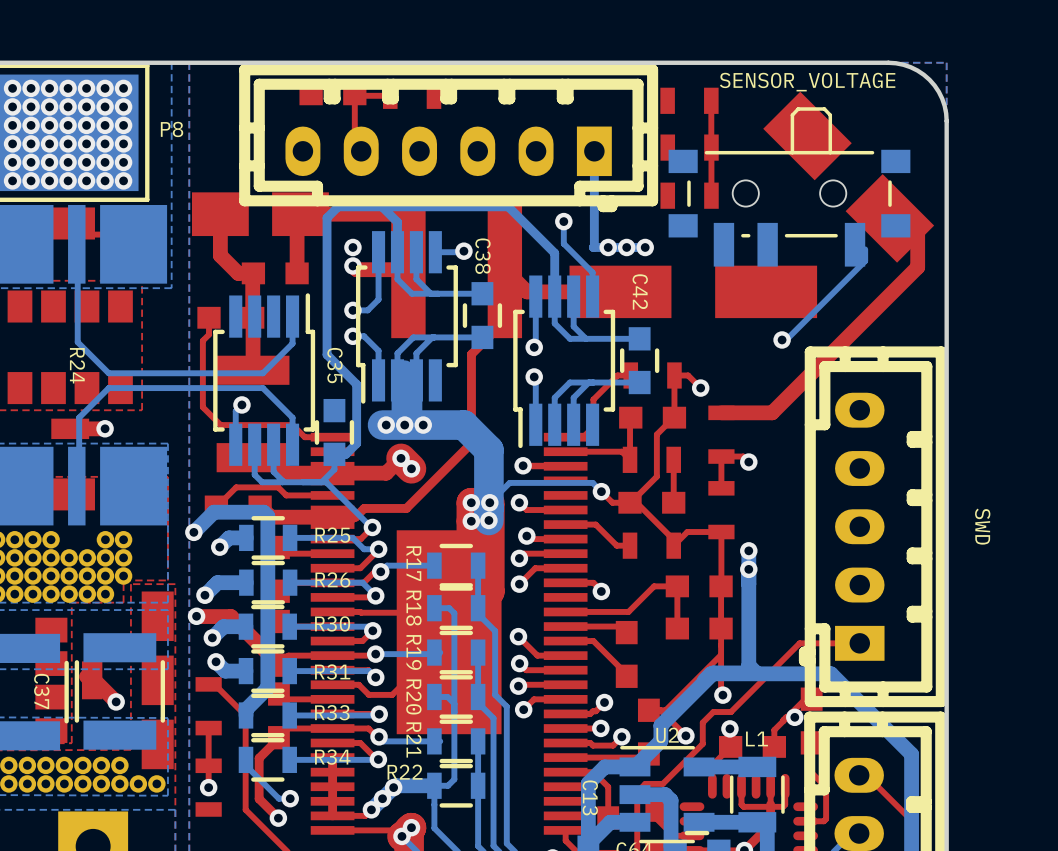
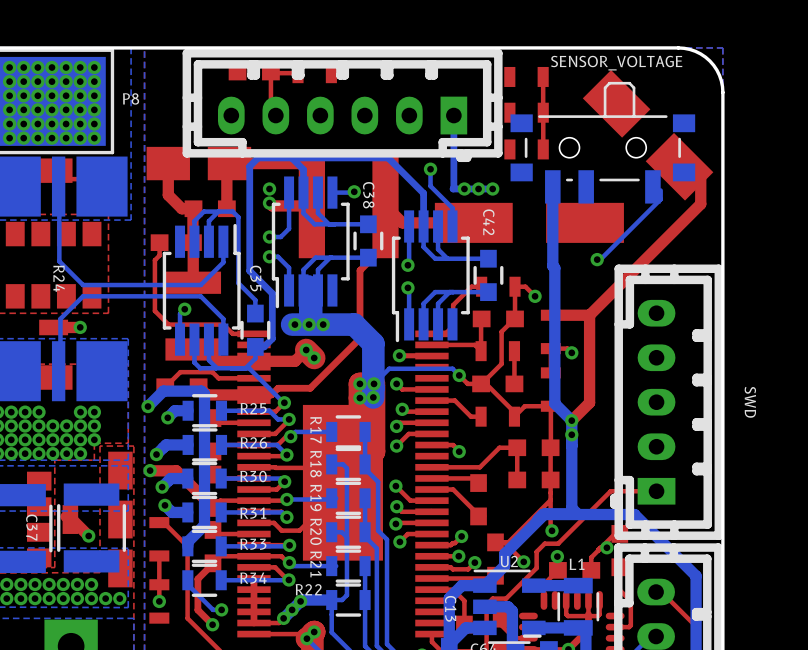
bottom track: none -> (552, 186) (554, 403) (571, 420)
bottom track: none -> (218, 211) (208, 221) (208, 241)
bottom track: none -> (194, 241) (194, 221) (203, 211) (232, 211) (238, 217) (238, 283) (255, 300) (255, 313)
top track: none -> (589, 315) (589, 402) (571, 420)

